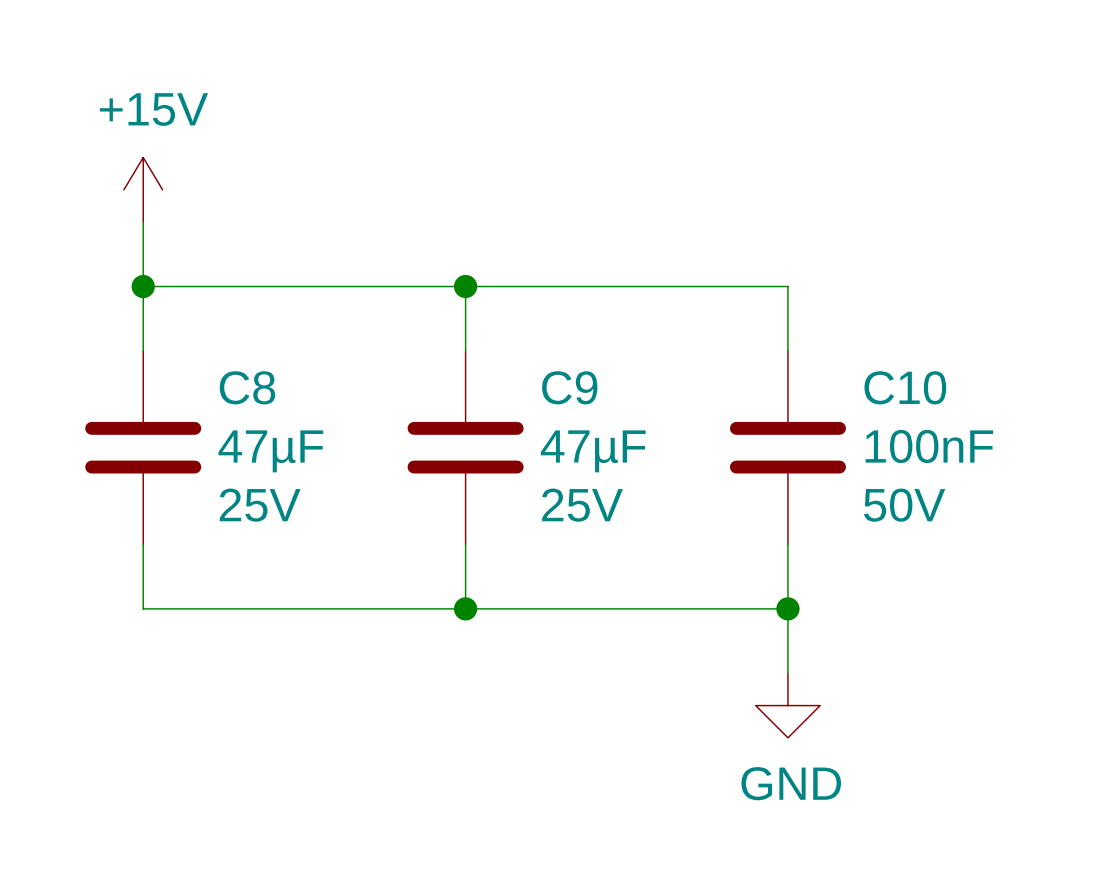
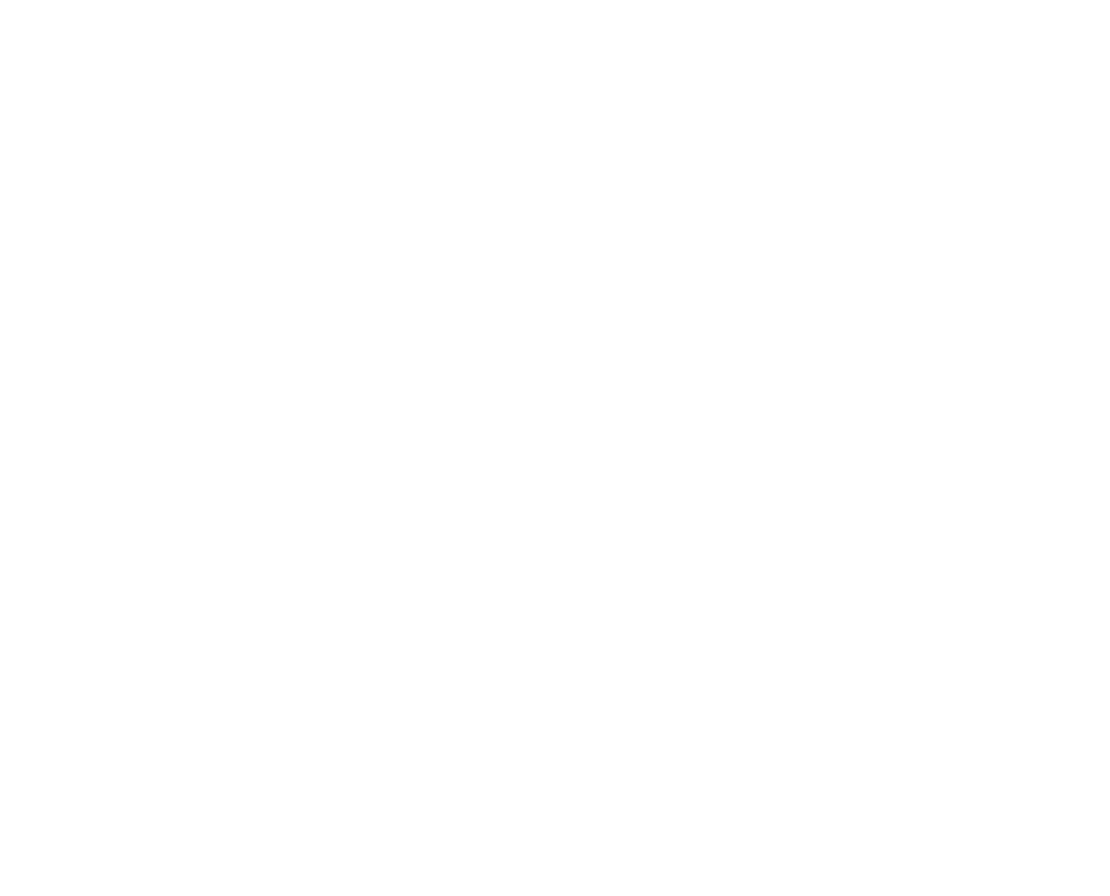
power symbol: +15V (143, 189) -> none
wire: (143, 222) (143, 351) -> none
wire: (143, 286) (787, 286) (787, 351) -> none
junction: (143, 286) -> none
wire: (465, 286) (465, 351) -> none
junction: (465, 286) -> none
C8: 47µF (143, 447) -> none
C9: 47µF (465, 447) -> none
C10: 100nF (787, 447) -> none
wire: (143, 544) (143, 608) (787, 608) -> none
wire: (465, 544) (465, 608) -> none
wire: (787, 544) (787, 673) -> none
junction: (465, 608) -> none
junction: (787, 608) -> none
power symbol: GND (787, 705) -> none

